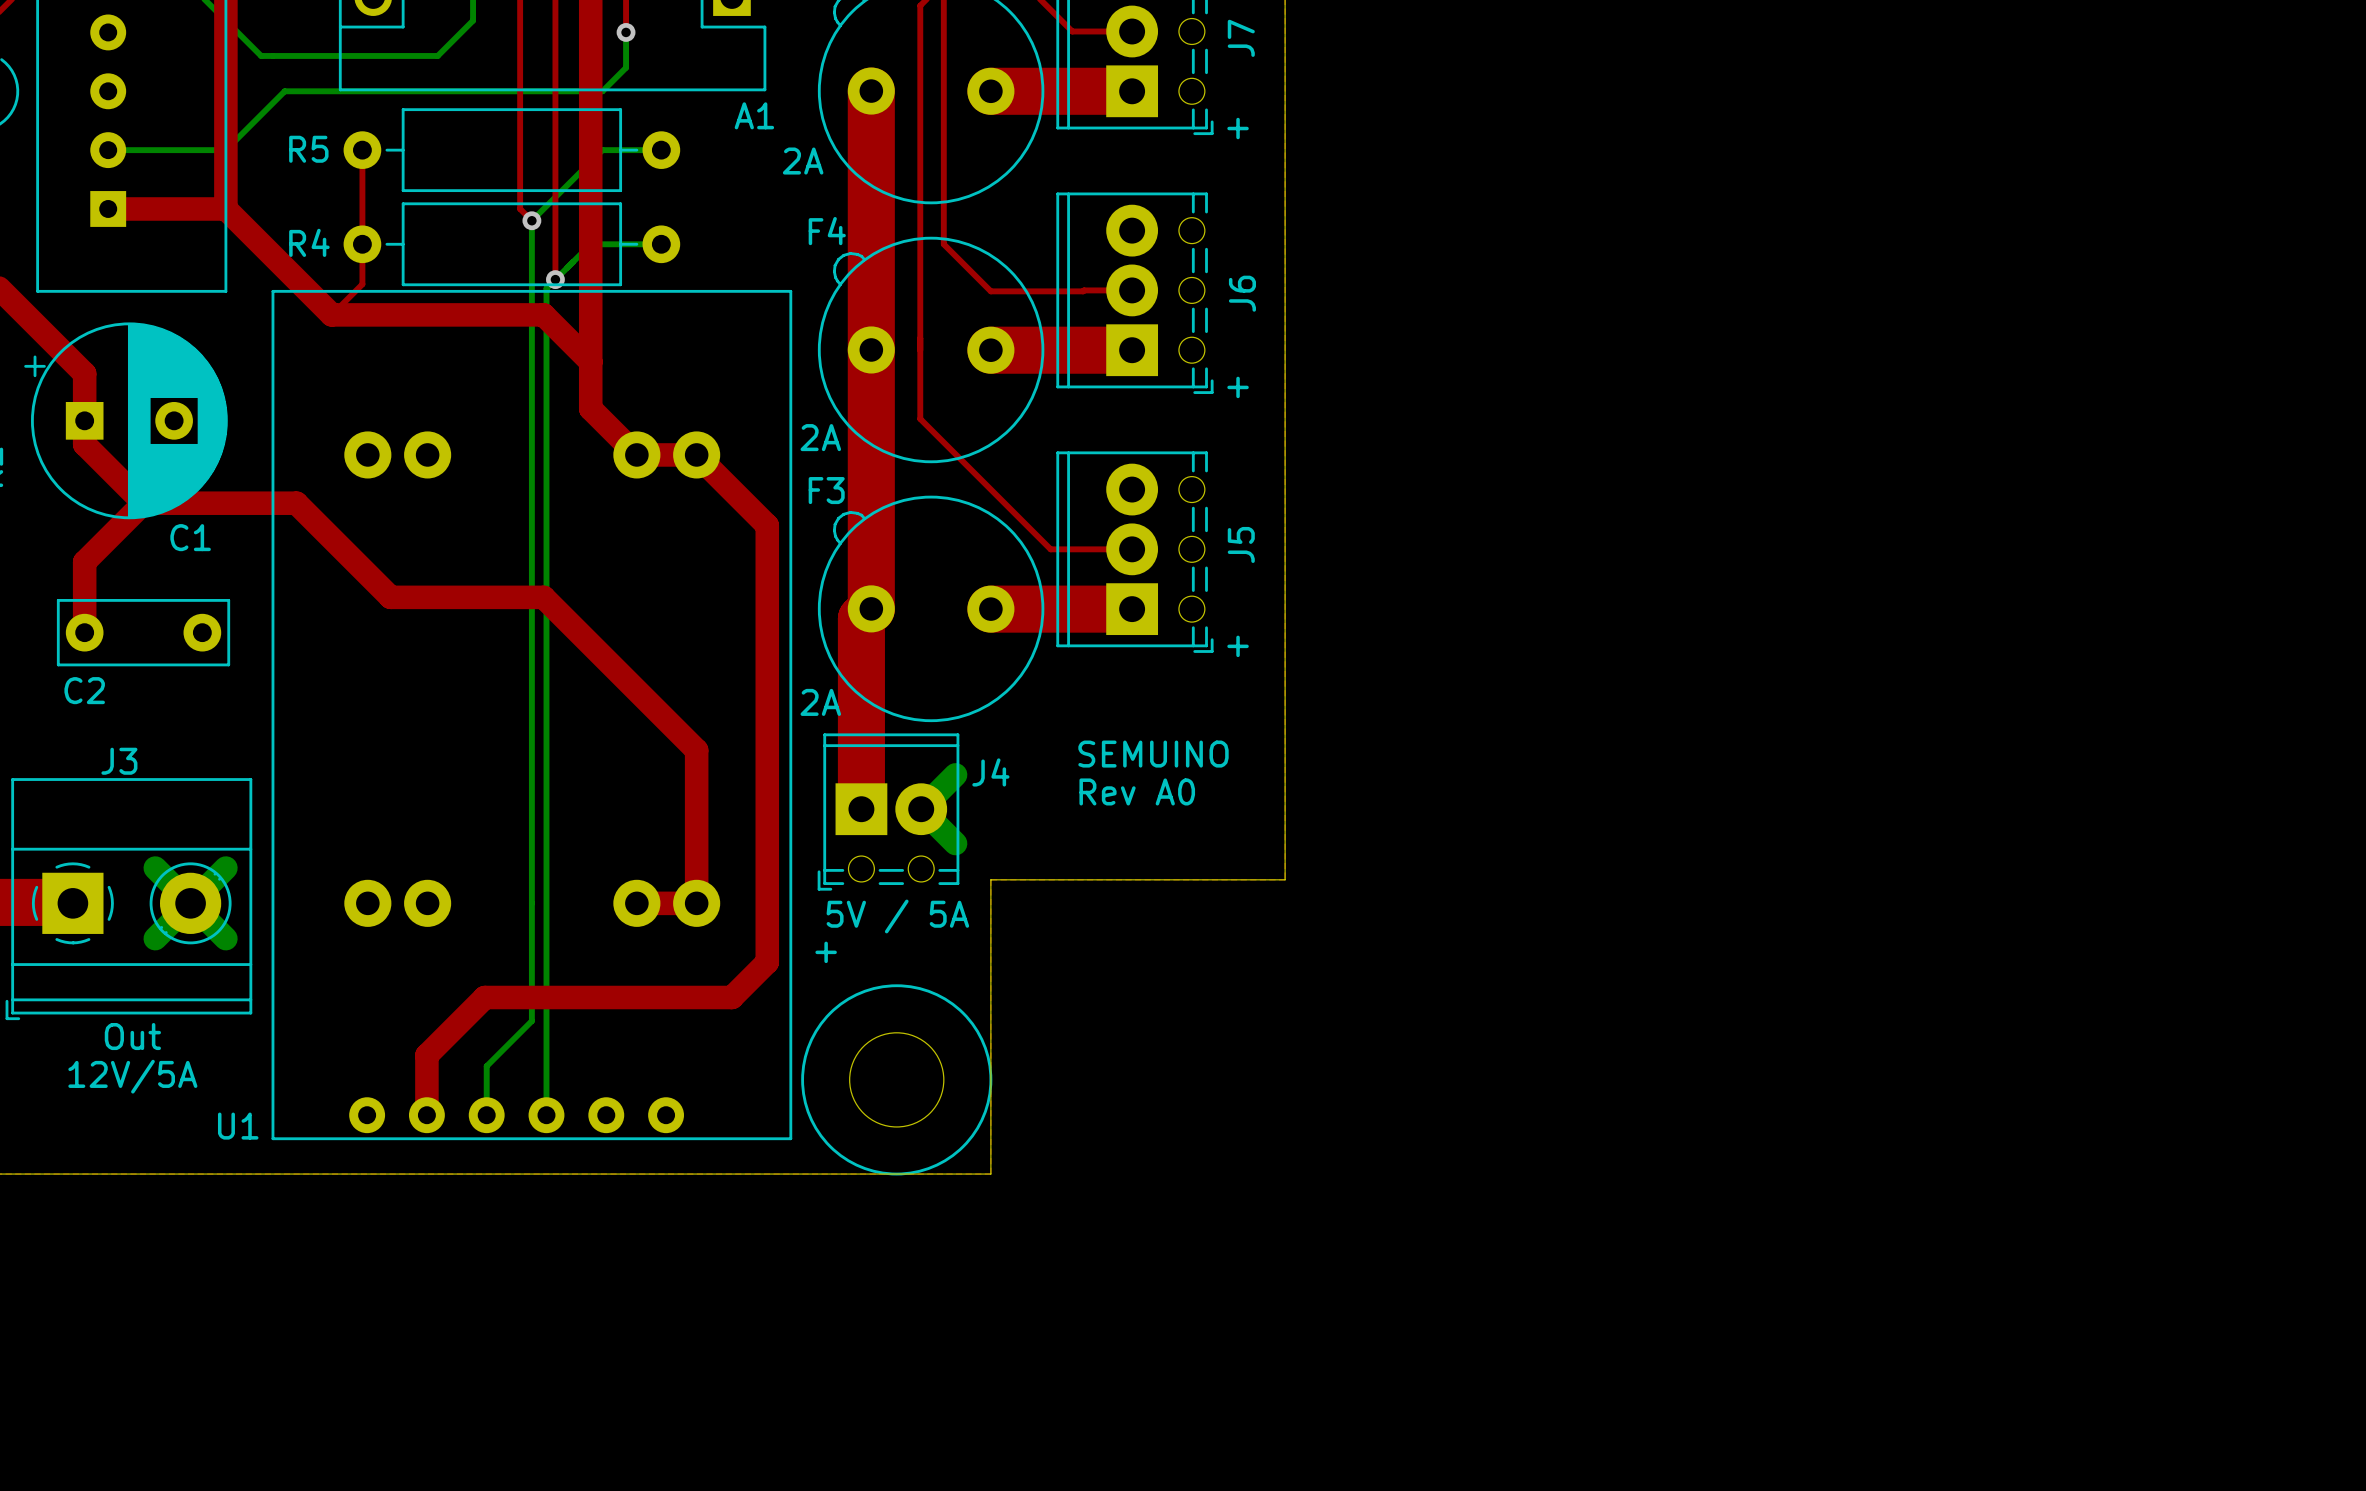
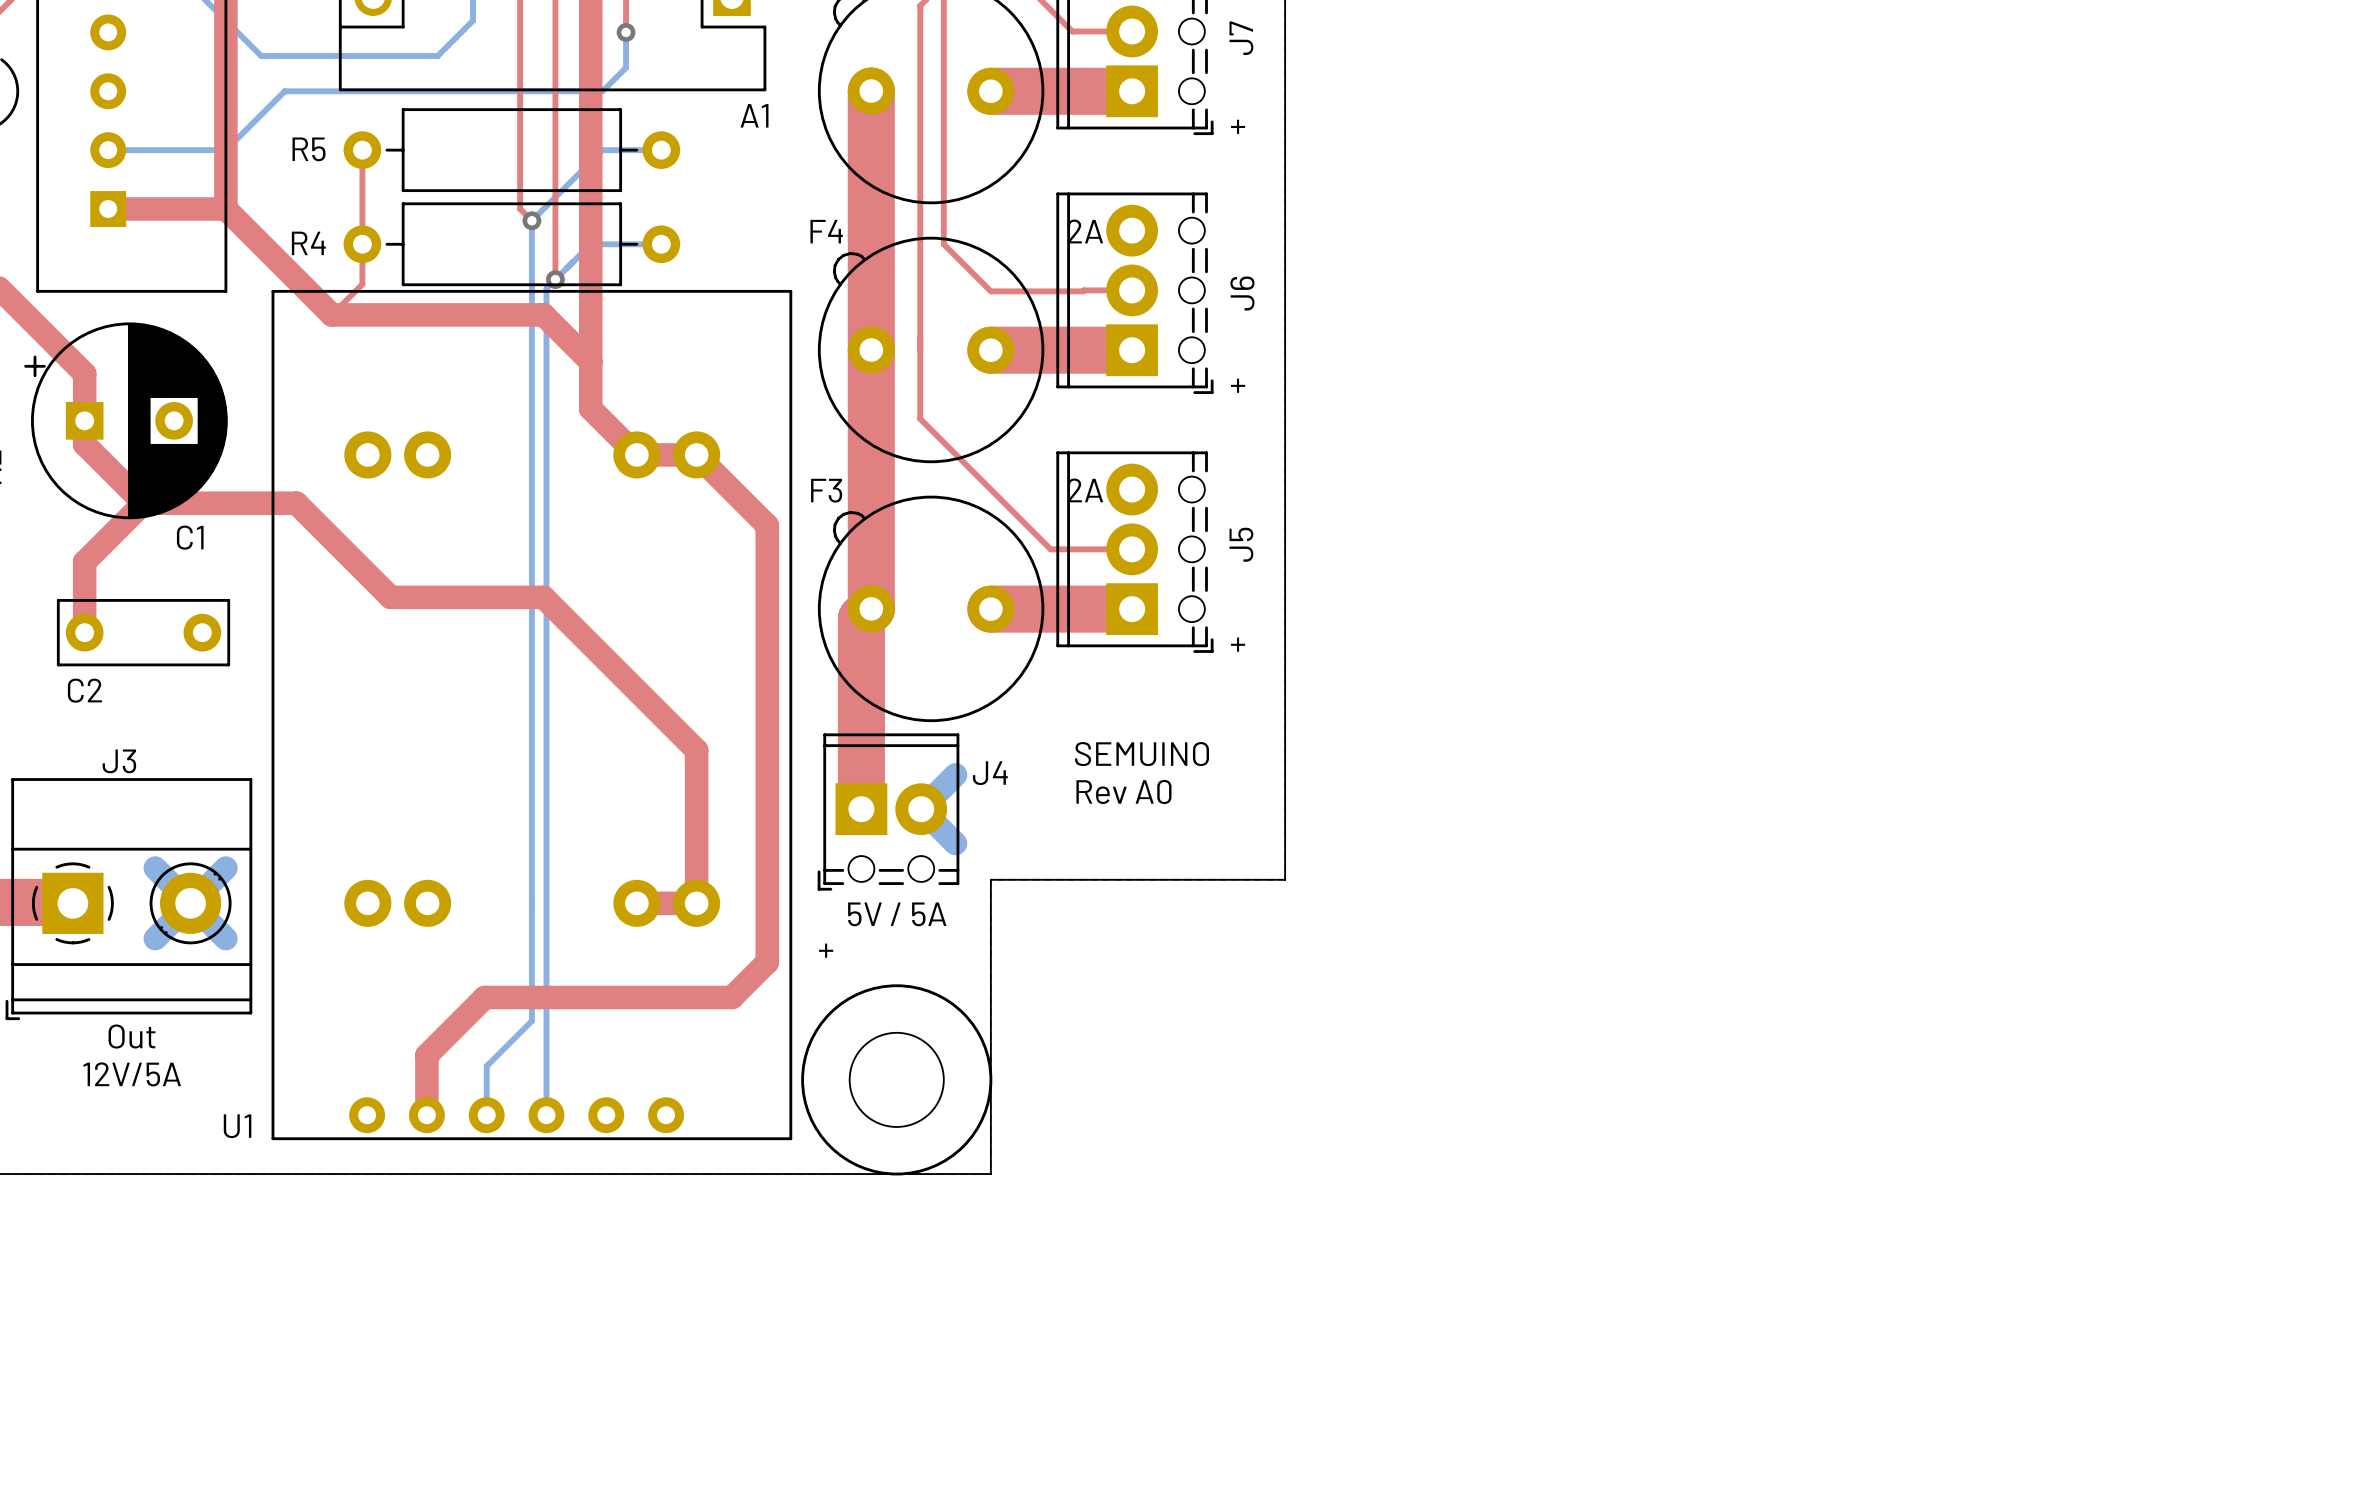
text: 2A (803, 161) -> none
text: none -> 2A (1085, 231)
text: 2A (820, 437) -> none
text: none -> 2A (1085, 490)
text: 2A (820, 702) -> none

